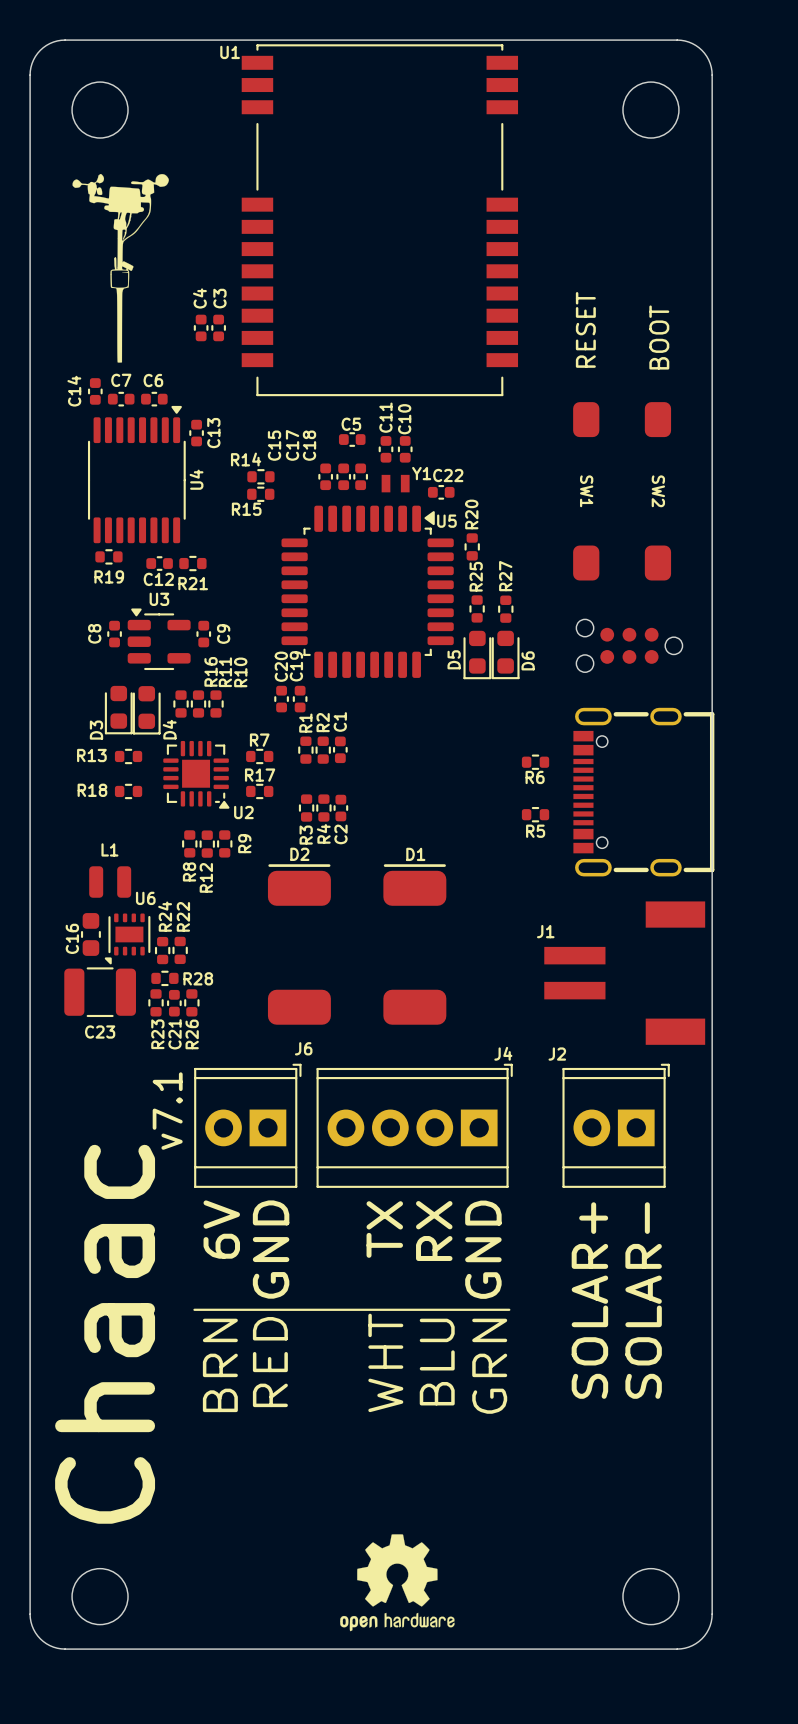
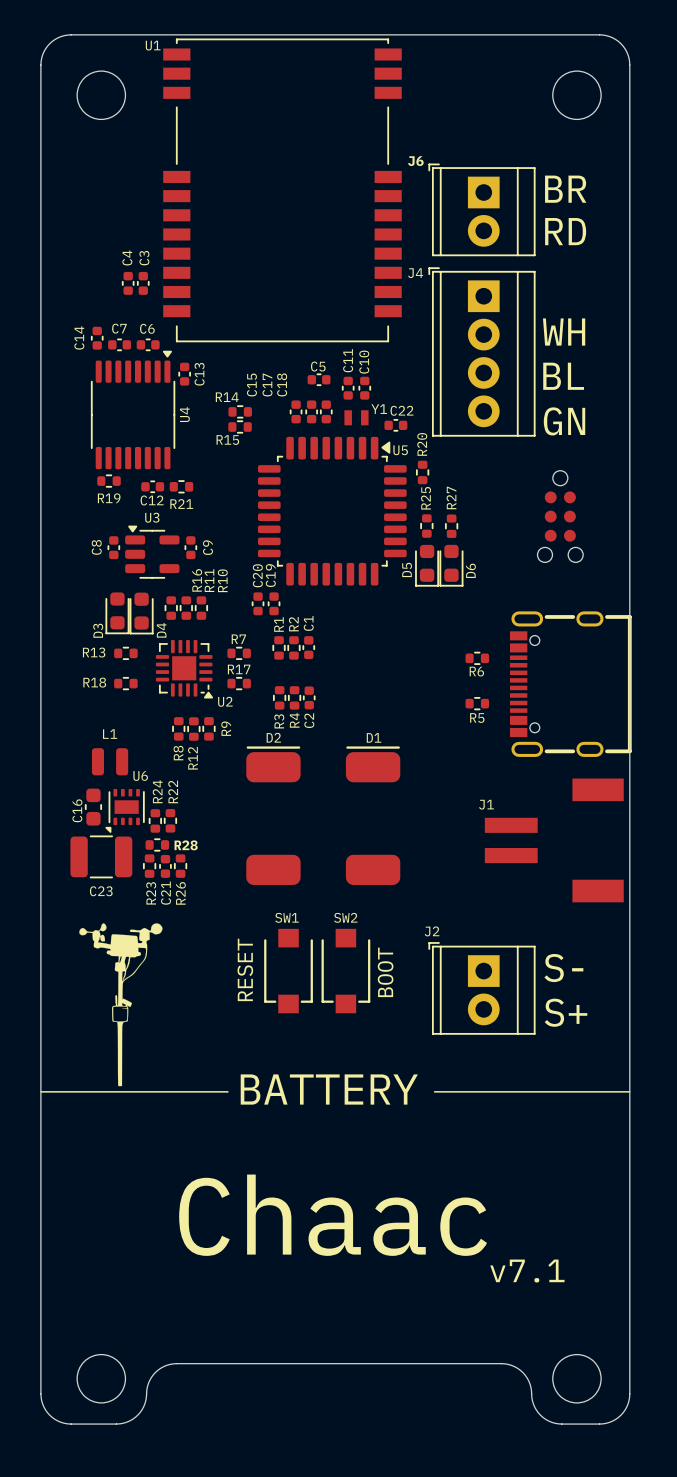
drawing: [72, 173, 169, 363] -> none
text: none -> BR (565, 189)
U1 position: (379, 220) -> (282, 190)
text: none -> RD (565, 231)
C4 position: (201, 327) -> (128, 283)
C3 position: (218, 327) -> (143, 283)
text: RESET (585, 329) -> none
text: BOOT (659, 337) -> none
text: none -> WH (564, 332)
SW1 footprint: [573, 402, 600, 581] -> [264, 928, 313, 1014]
SW2 footprint: [644, 402, 672, 581] -> [321, 928, 371, 1014]
text: none -> BL (563, 376)
text: none -> GN (564, 421)
SW1 name position: SW1 (586, 491) -> SW1 (287, 917)
SW2 name position: SW2 (658, 491) -> SW2 (345, 917)
part rotation: 0° (629, 645) -> 90° counterclockwise (560, 516)
drawing: none -> [79, 923, 163, 1087]
text: v7.1 (167, 1111) -> none
text: none -> RESET (245, 969)
text: none -> BOOT (385, 972)
text: none -> S- (563, 968)
J6 rotation: 0° (247, 1125) -> 90° counterclockwise (481, 209)
J6 position: (247, 1125) -> (481, 209)
J4 rotation: 0° (414, 1125) -> 90° counterclockwise (481, 351)
J4 position: (414, 1125) -> (481, 351)
J2 rotation: 0° (616, 1125) -> 90° counterclockwise (481, 988)
J2 position: (616, 1125) -> (481, 988)
text: 6V (221, 1229) -> none
text: TX (384, 1229) -> none
text: RX (434, 1231) -> none
text: GND (271, 1249) -> none
text: GND (483, 1249) -> none
text: none -> BATTERY (329, 1089)
line: none -> (40, 1091) (227, 1091)
line: none -> (434, 1091) (629, 1091)
text: SOLAR+ (589, 1300) -> S+ (566, 1012)
text: SOLAR- (643, 1300) -> none
line: (194, 1309) (509, 1309) -> none
text rotation: 0° (105, 1334) -> 90° clockwise (333, 1215)
text: RED (270, 1362) -> none
text: WHT (385, 1362) -> none
text: BLU (437, 1362) -> none
text: BRN (220, 1365) -> none
text: GRN (489, 1366) -> none
text: none -> v7.1 (527, 1271)
drawing: [340, 1534, 455, 1632] -> none
board edge: (117, 1649) (633, 1649) -> (116, 1424) (129, 1421) (140, 1412) (145, 1400) (148, 1383) (155, 1372) (163, 1366) (176, 1363) (504, 1363) (517, 1368) (527, 1377) (530, 1387) (533, 1403) (540, 1415) (548, 1421) (561, 1424)

